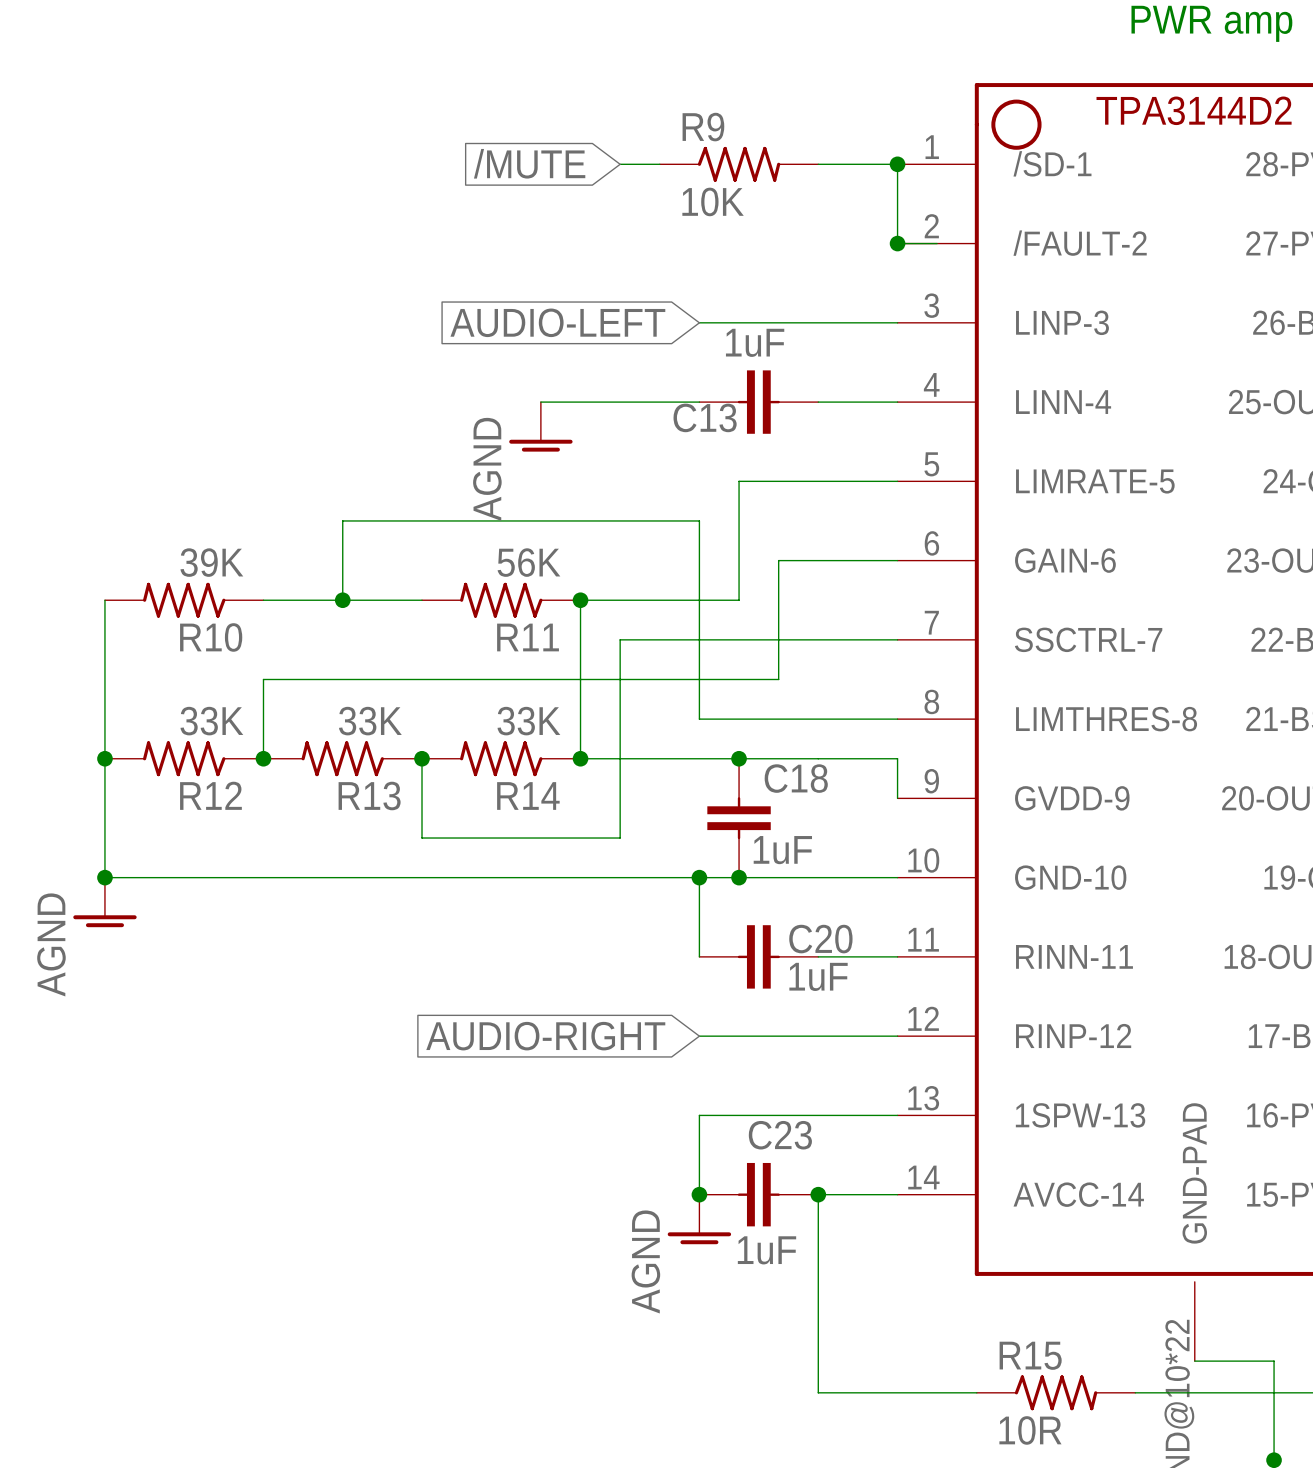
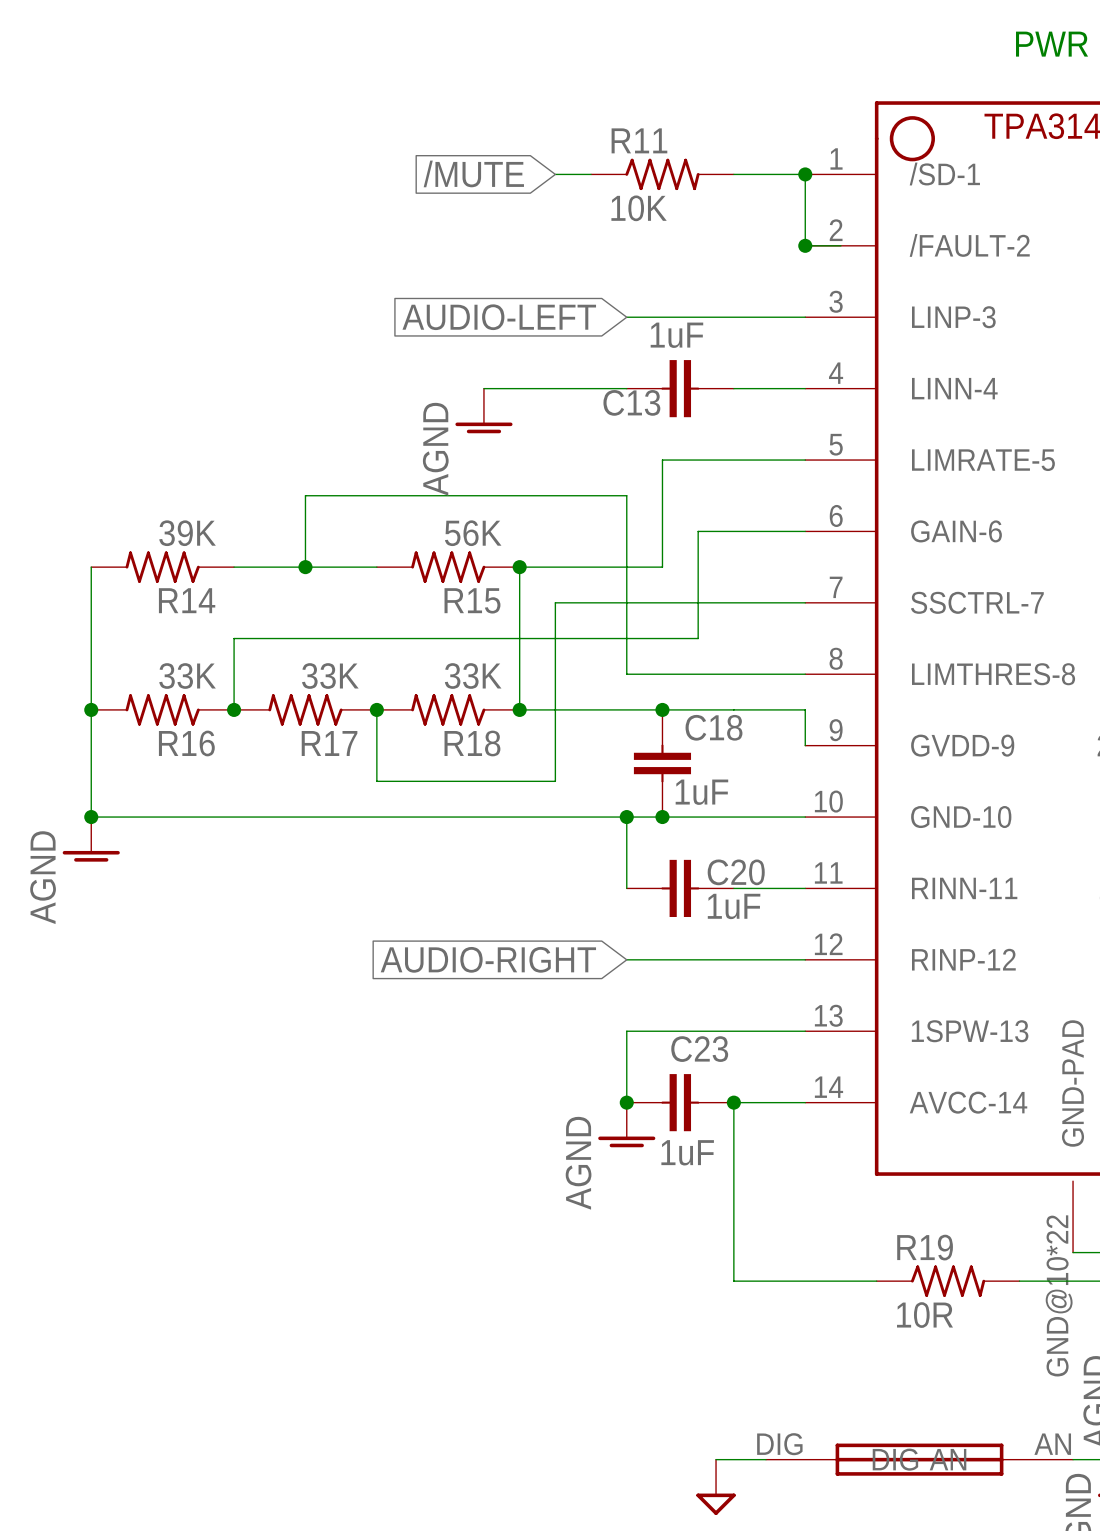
R9 name: R9 (703, 127) -> R11 (639, 140)
R10 name: R10 (211, 637) -> R14 (187, 600)
R11 name: R11 (528, 637) -> R15 (472, 600)
R12 name: R12 (210, 795) -> R16 (186, 743)
R13 name: R13 (369, 795) -> R17 (329, 743)
R14 name: R14 (528, 796) -> R18 (472, 743)
R15 name: R15 (1030, 1355) -> R19 (925, 1247)

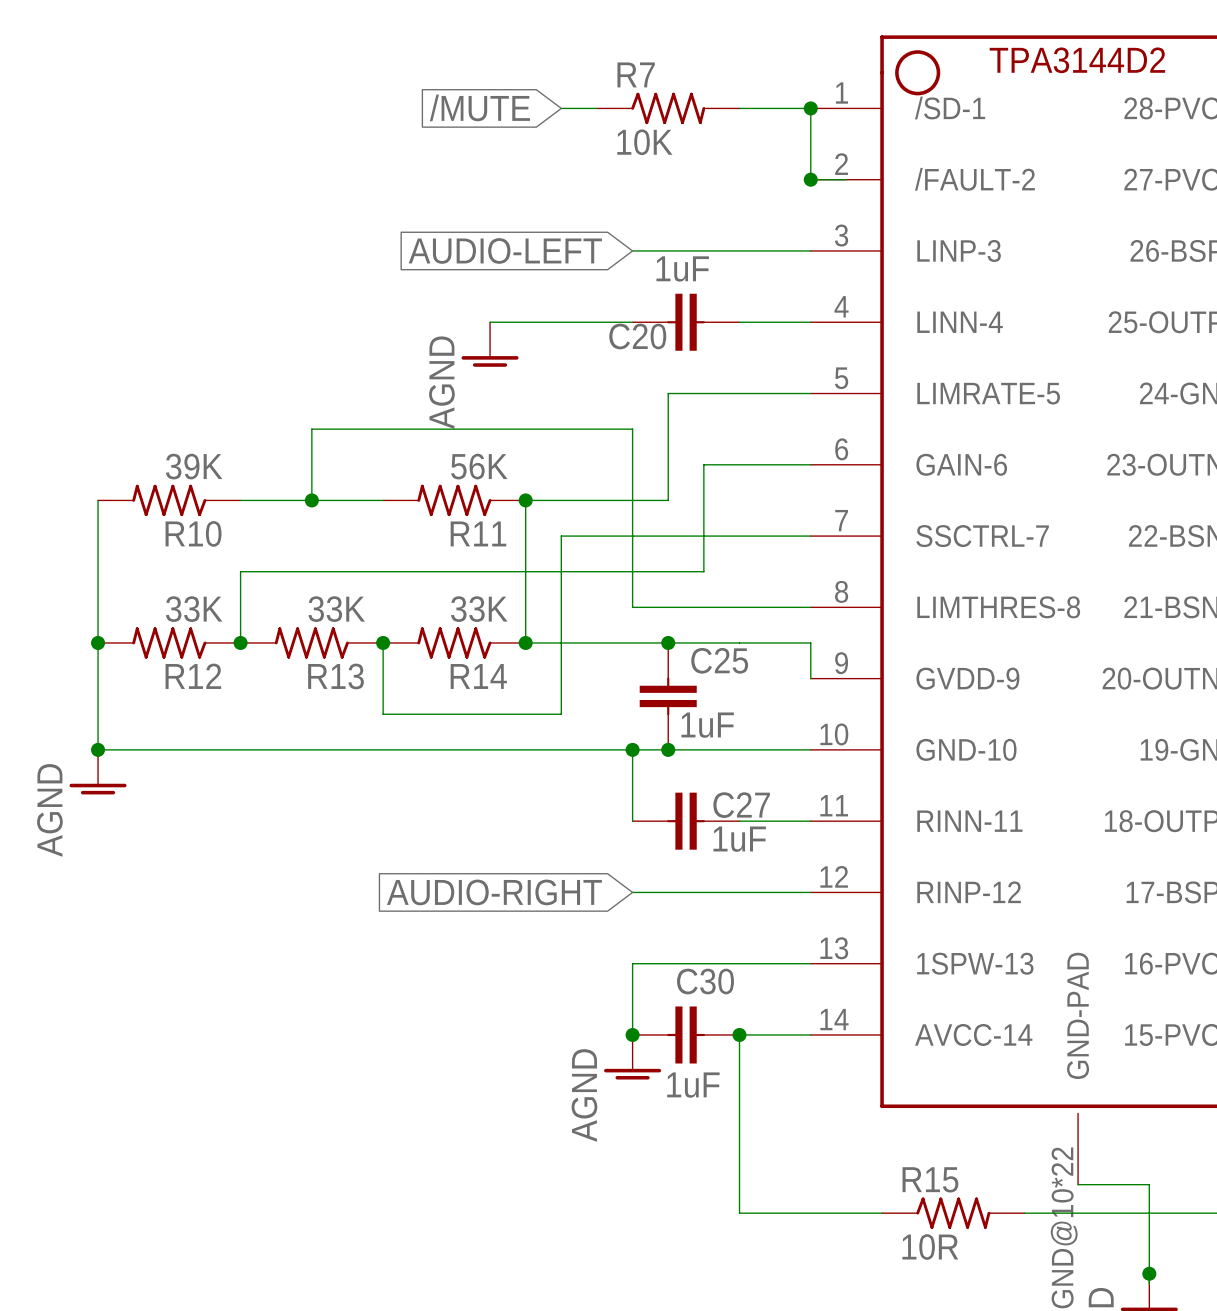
R11 name: R11 (639, 140) -> R7 (636, 74)
C13 name: C13 (631, 402) -> C20 (637, 336)
R14 name: R14 (187, 600) -> R10 (193, 533)
R15 name: R15 (472, 600) -> R11 (478, 533)
C18 name: C18 (713, 727) -> C25 (719, 660)
R16 name: R16 (186, 743) -> R12 (193, 676)
R17 name: R17 (329, 743) -> R13 (336, 676)
R18 name: R18 (472, 743) -> R14 (478, 676)
C20 name: C20 (736, 872) -> C27 (741, 805)
C23 name: C23 (699, 1049) -> C30 (705, 981)
R19 name: R19 (925, 1247) -> R15 (930, 1179)

